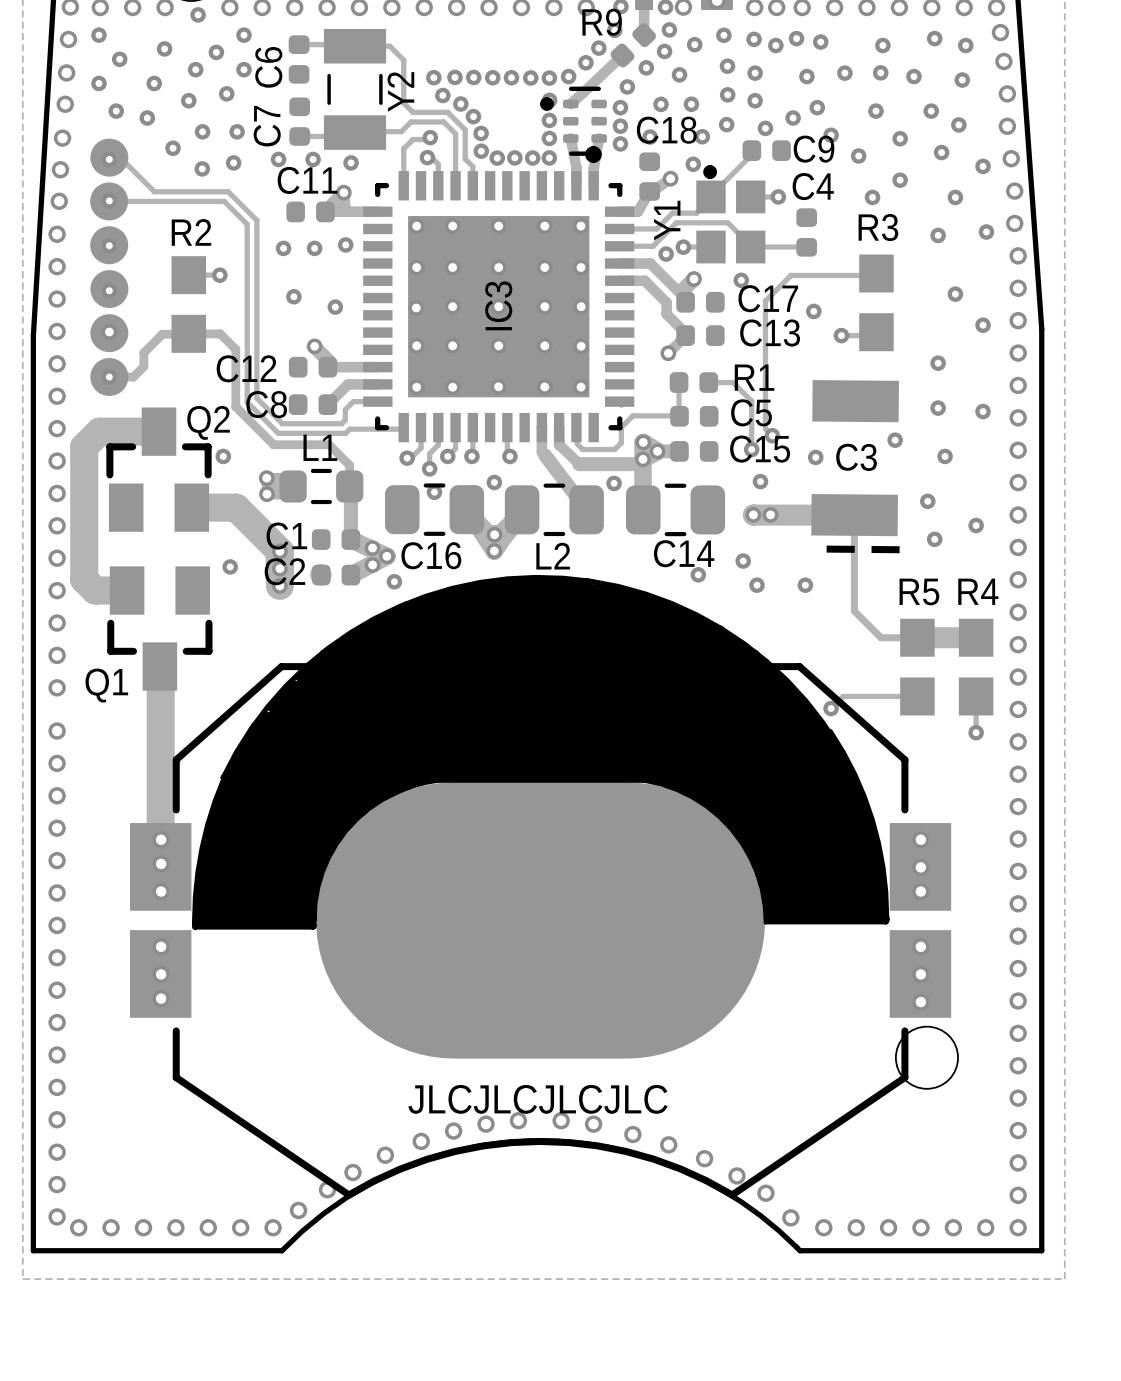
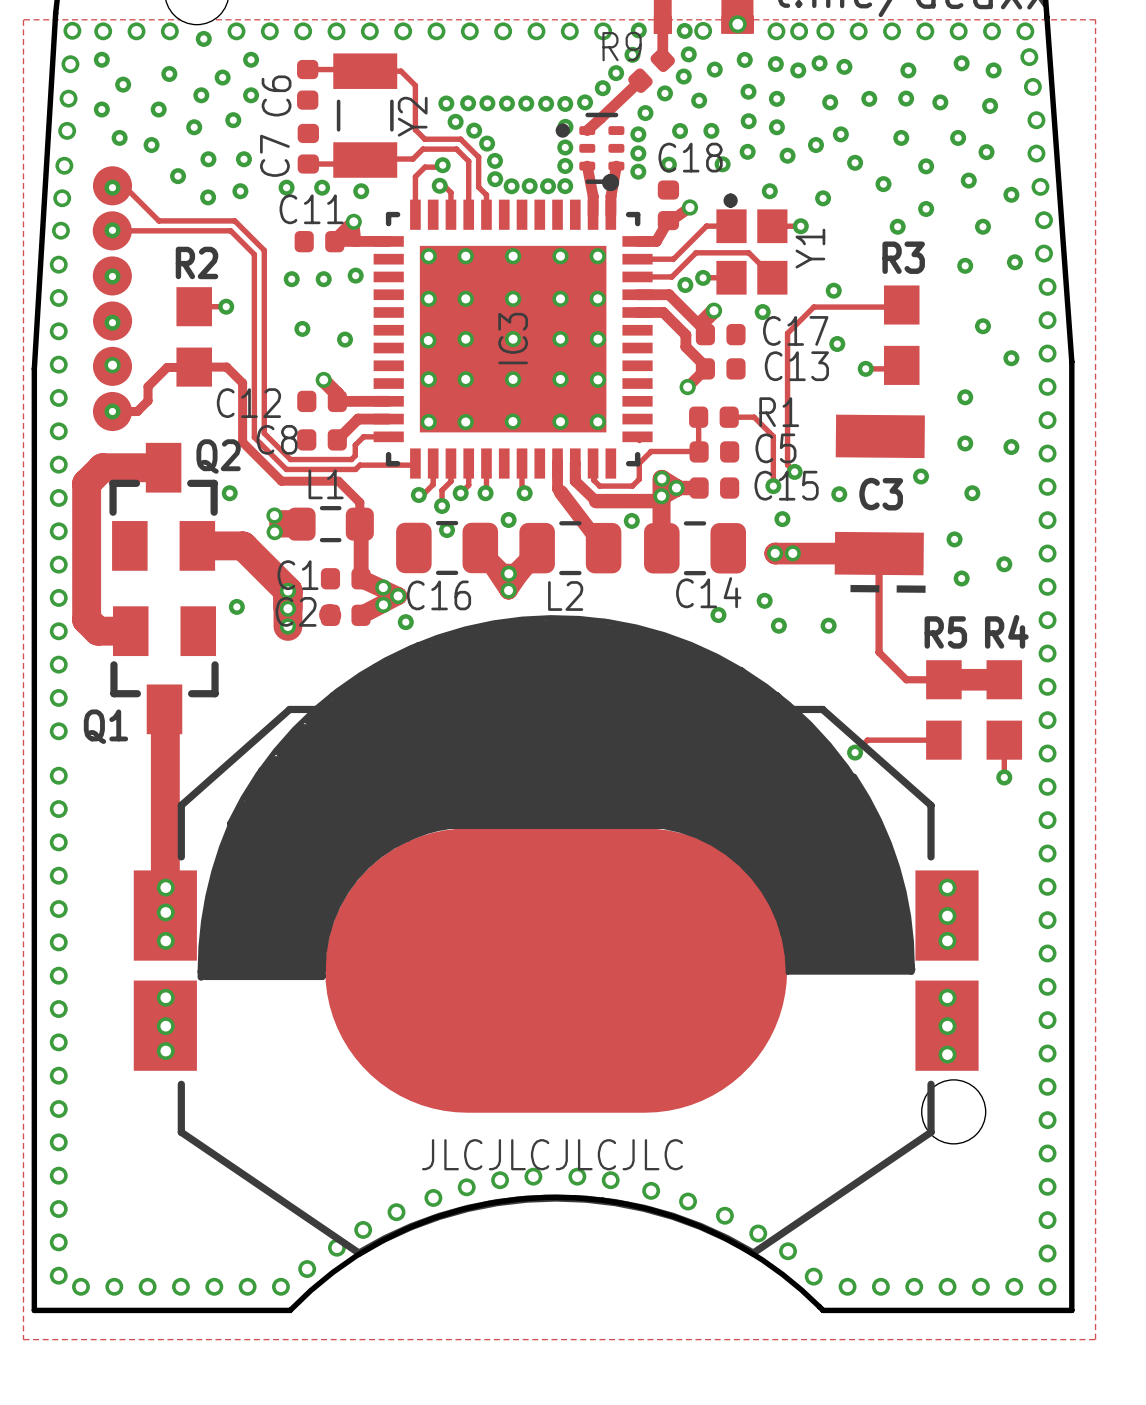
track: (751, 150) (751, 154) (710, 195) (710, 198) (696, 213) (672, 213) (654, 228) -> (731, 226) (706, 226) (673, 259)
C9: (766, 150) -> none
via: none -> (769, 191)
via: (693, 164) -> none
via: none -> (823, 198)
Y1 name position: Y1 (667, 220) -> Y1 (810, 248)
C4: (806, 232) -> none
track: (750, 247) (806, 247) -> none
via: none -> (833, 290)

